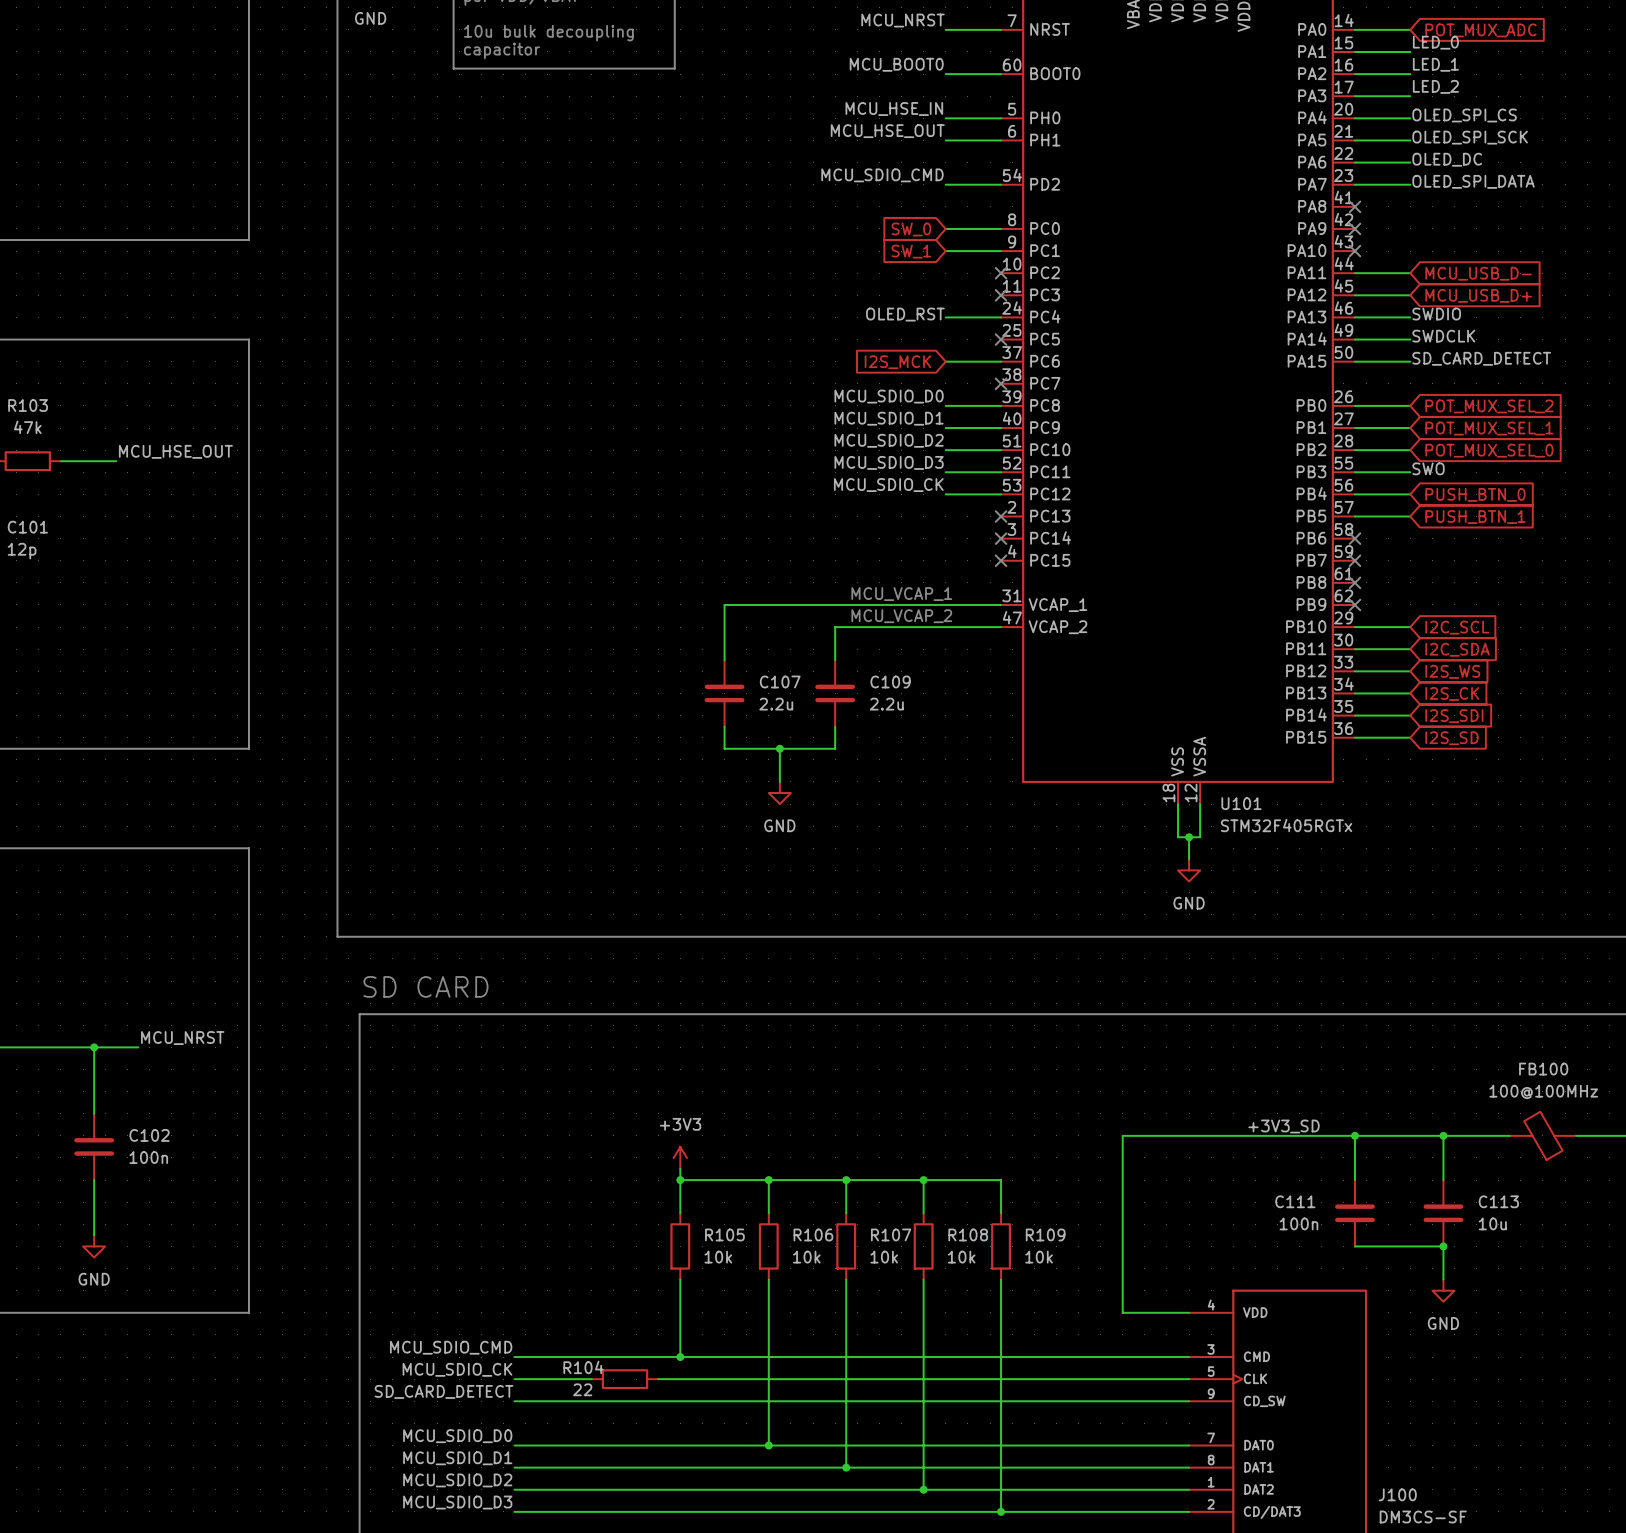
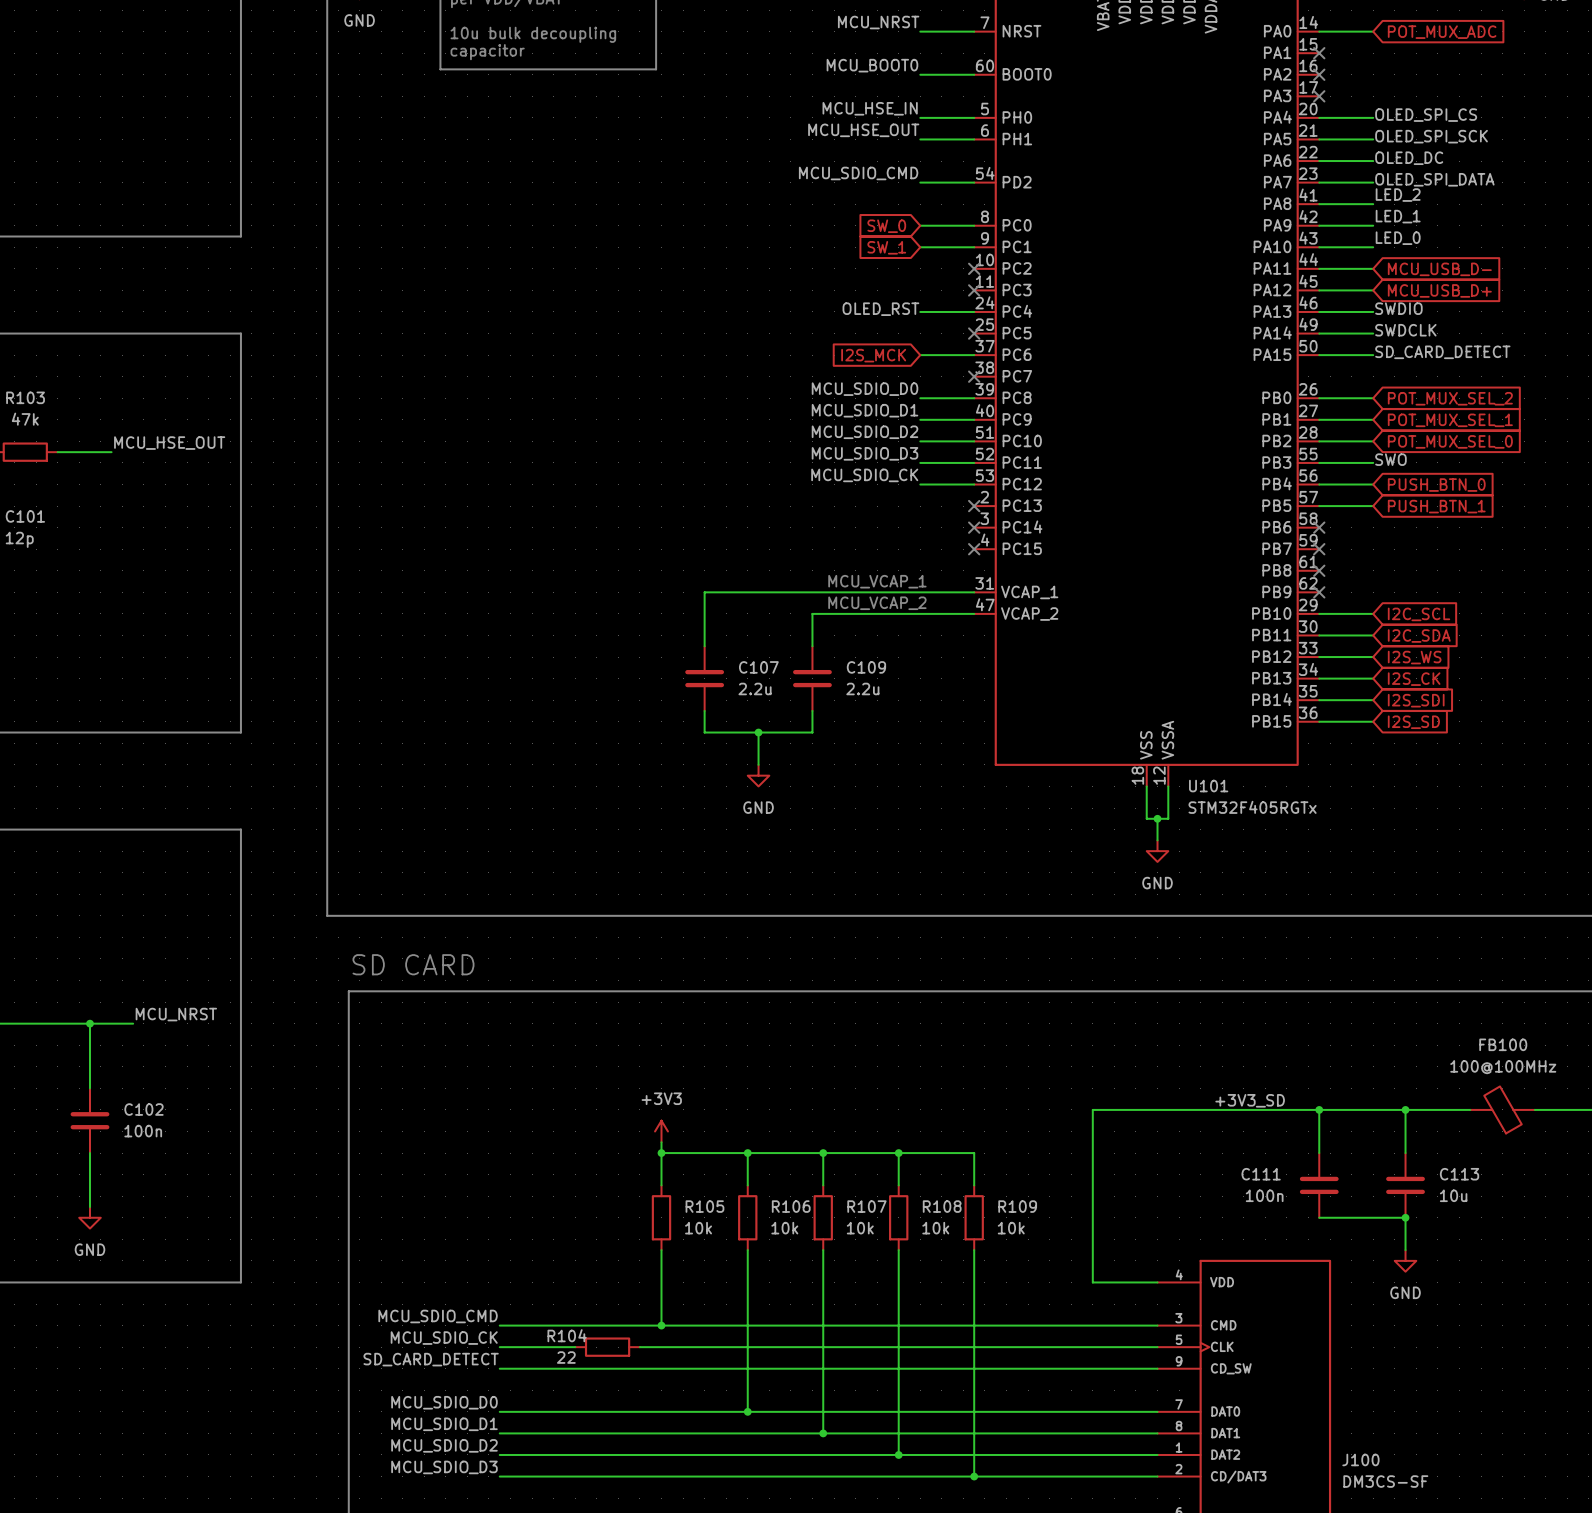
label position: LED_0 (1435, 42) -> LED_0 (1398, 238)
wire: (1354, 51) (1410, 51) -> (1319, 204) (1373, 204)
no-connect mark: none -> (1319, 53)
label position: LED_1 (1435, 64) -> LED_1 (1398, 216)
wire: (1354, 74) (1410, 74) -> (1319, 225) (1373, 225)
no-connect mark: none -> (1319, 74)
label position: LED_2 (1435, 86) -> LED_2 (1398, 195)
wire: (1354, 96) (1410, 96) -> (1319, 247) (1373, 247)
no-connect mark: none -> (1319, 96)
no-connect mark: (1354, 206) -> none
no-connect mark: (1354, 228) -> none
no-connect mark: (1354, 251) -> none

